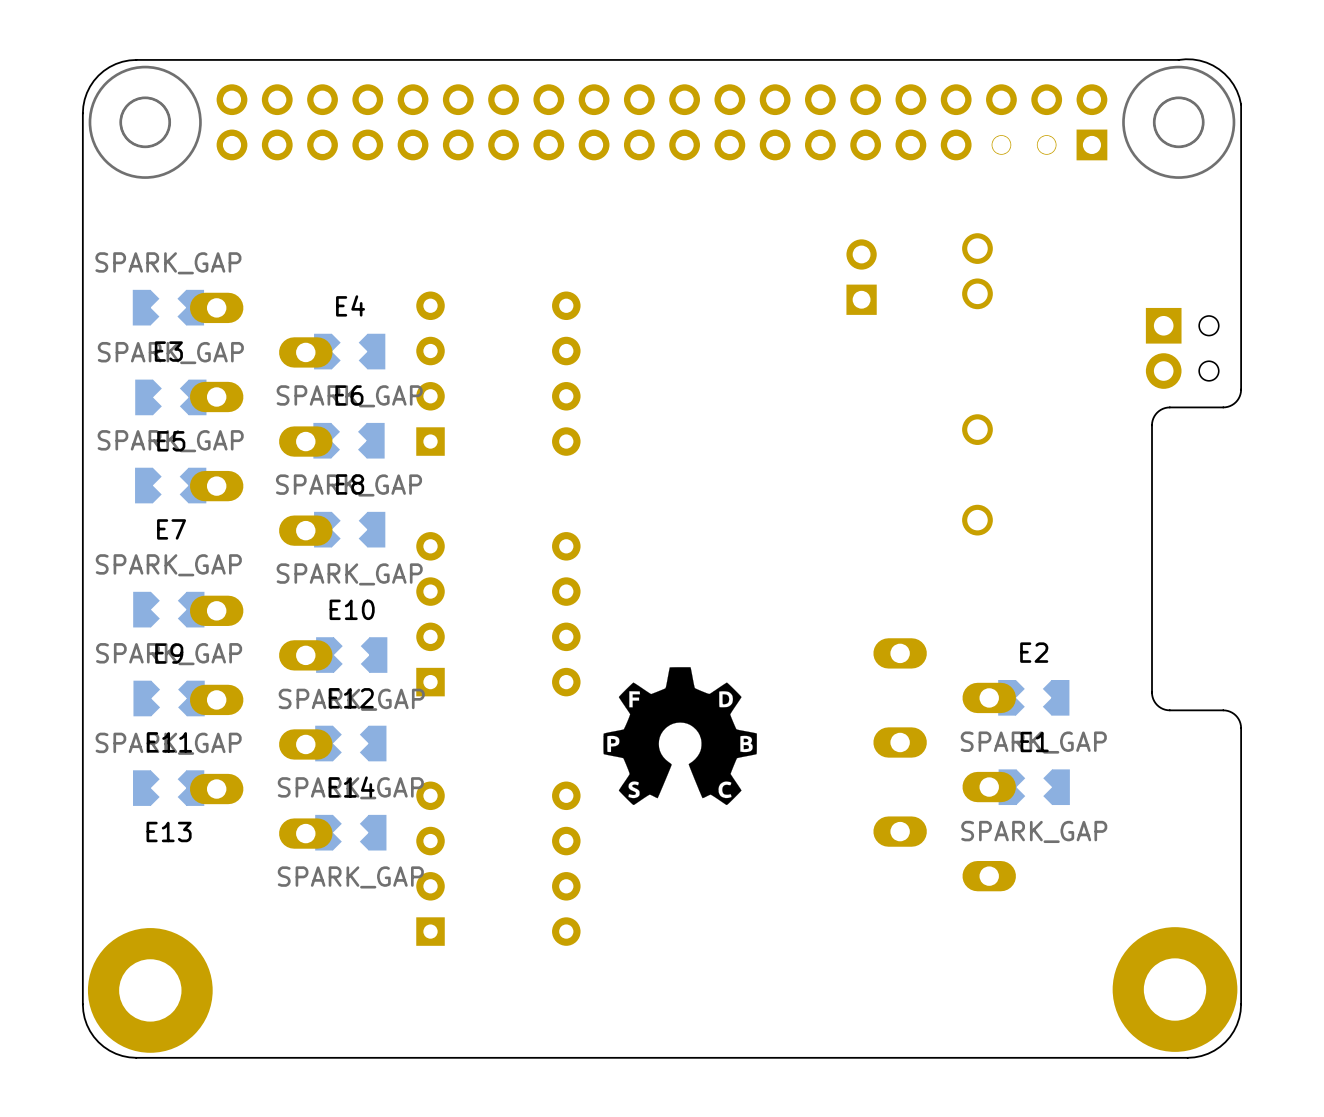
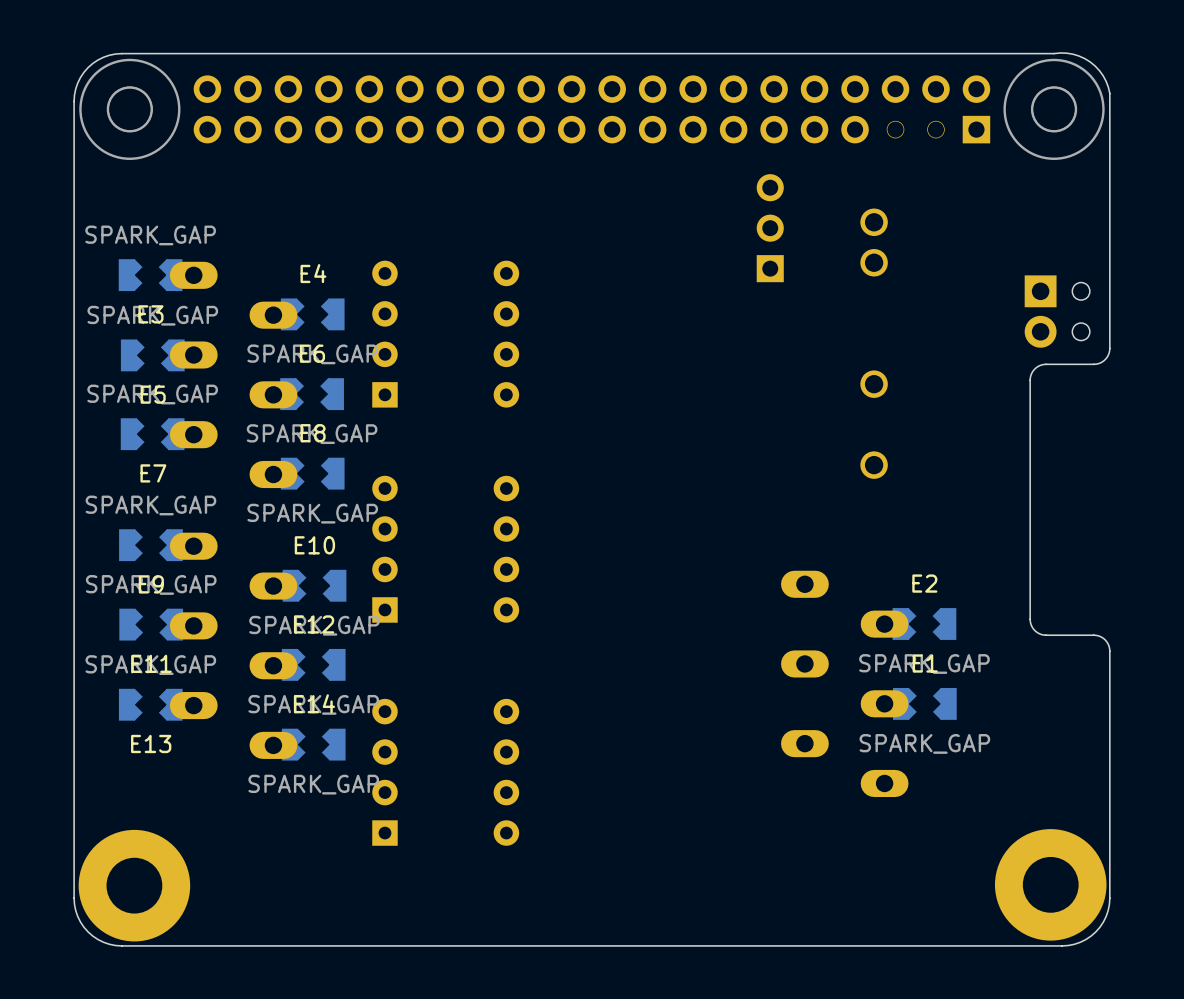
part: none -> (770, 228)
part: (861, 277) -> none
drawing: [603, 667, 757, 806] -> none

